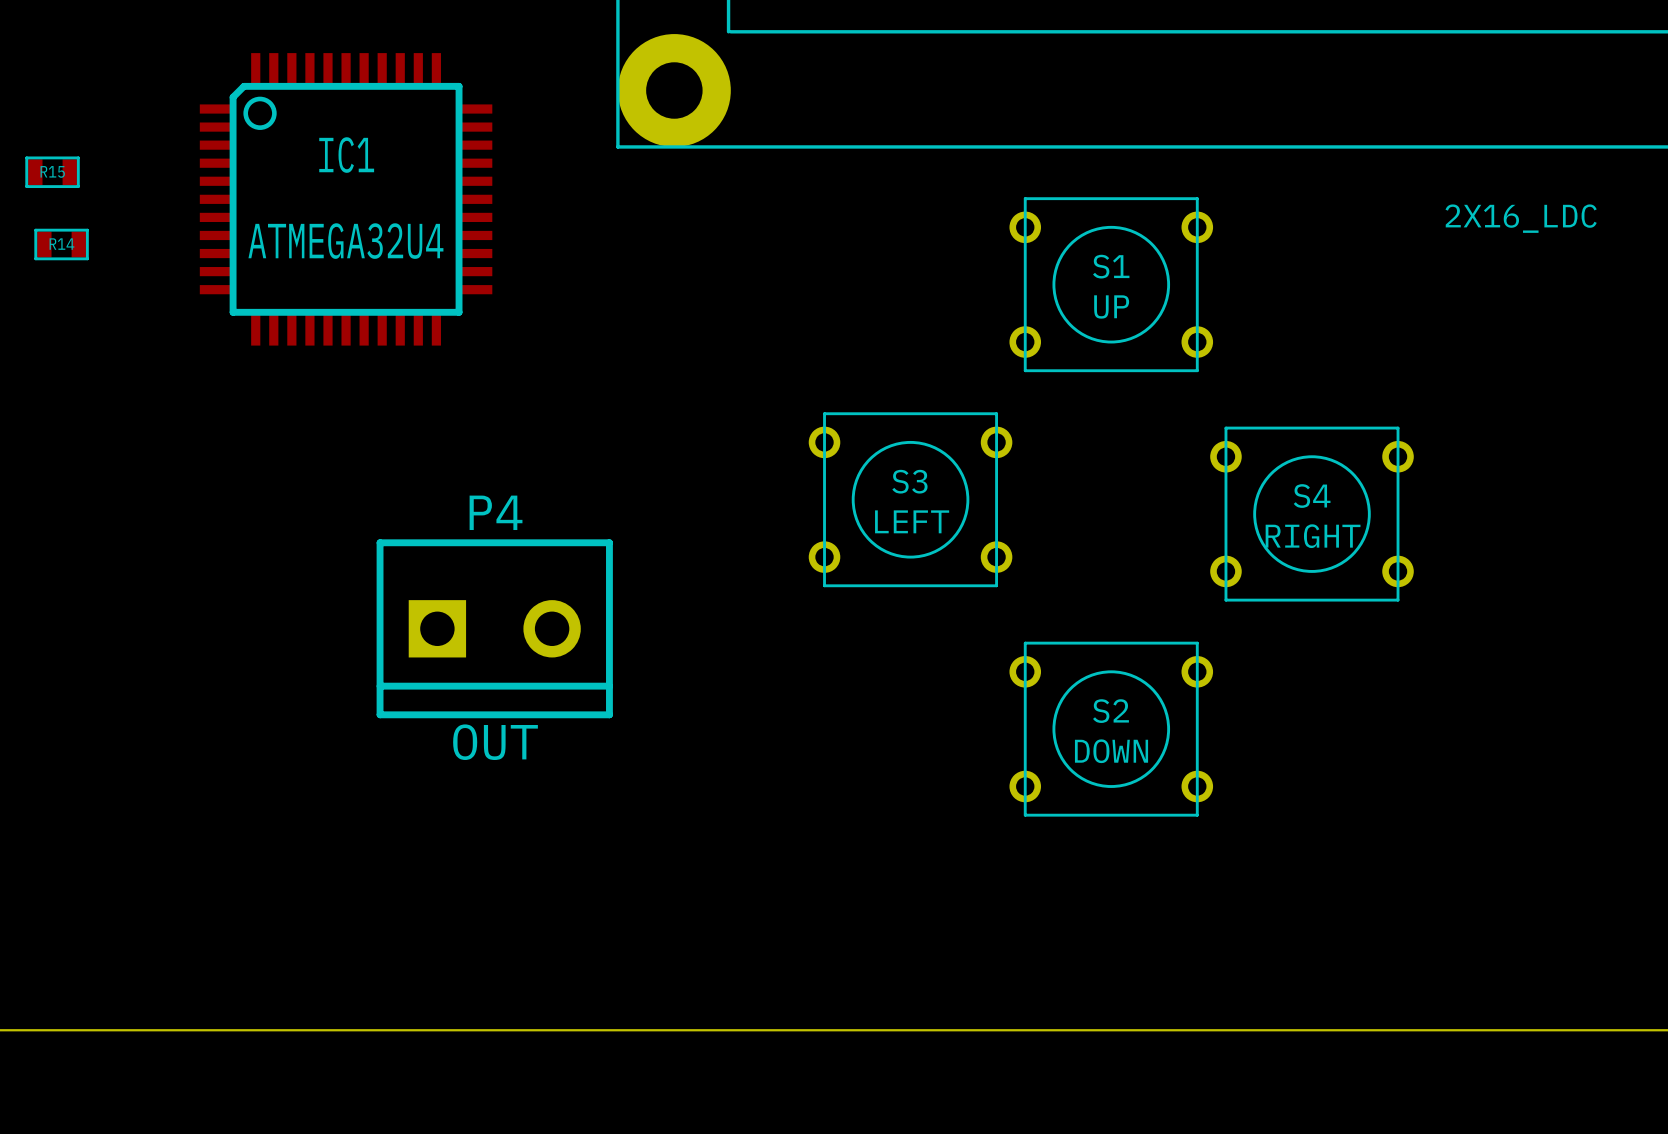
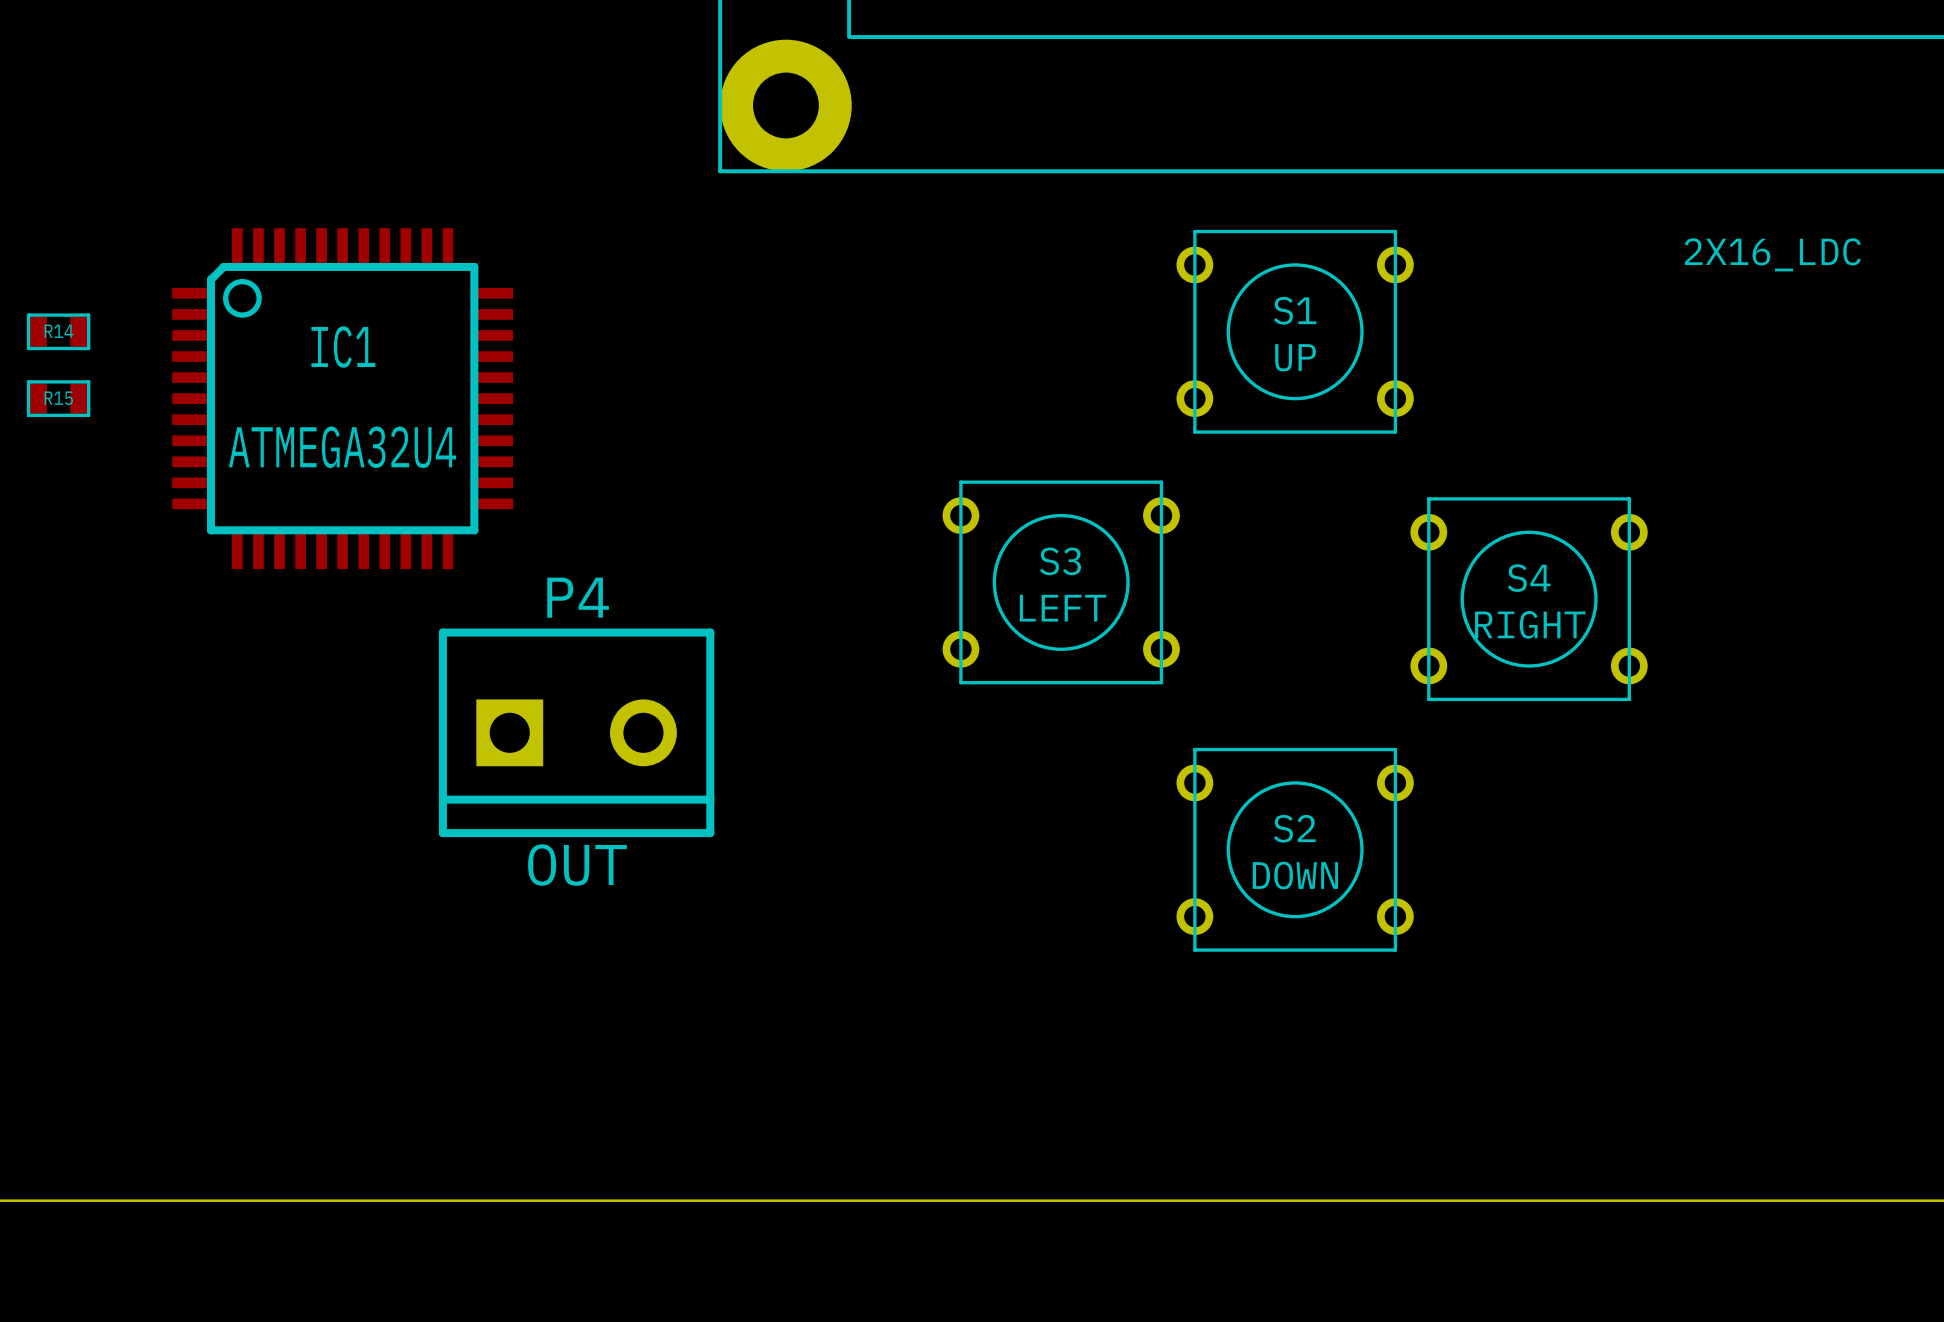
R15 position: (52, 172) -> (58, 398)
IC1 position: (346, 199) -> (342, 398)
R14 position: (61, 244) -> (58, 331)

